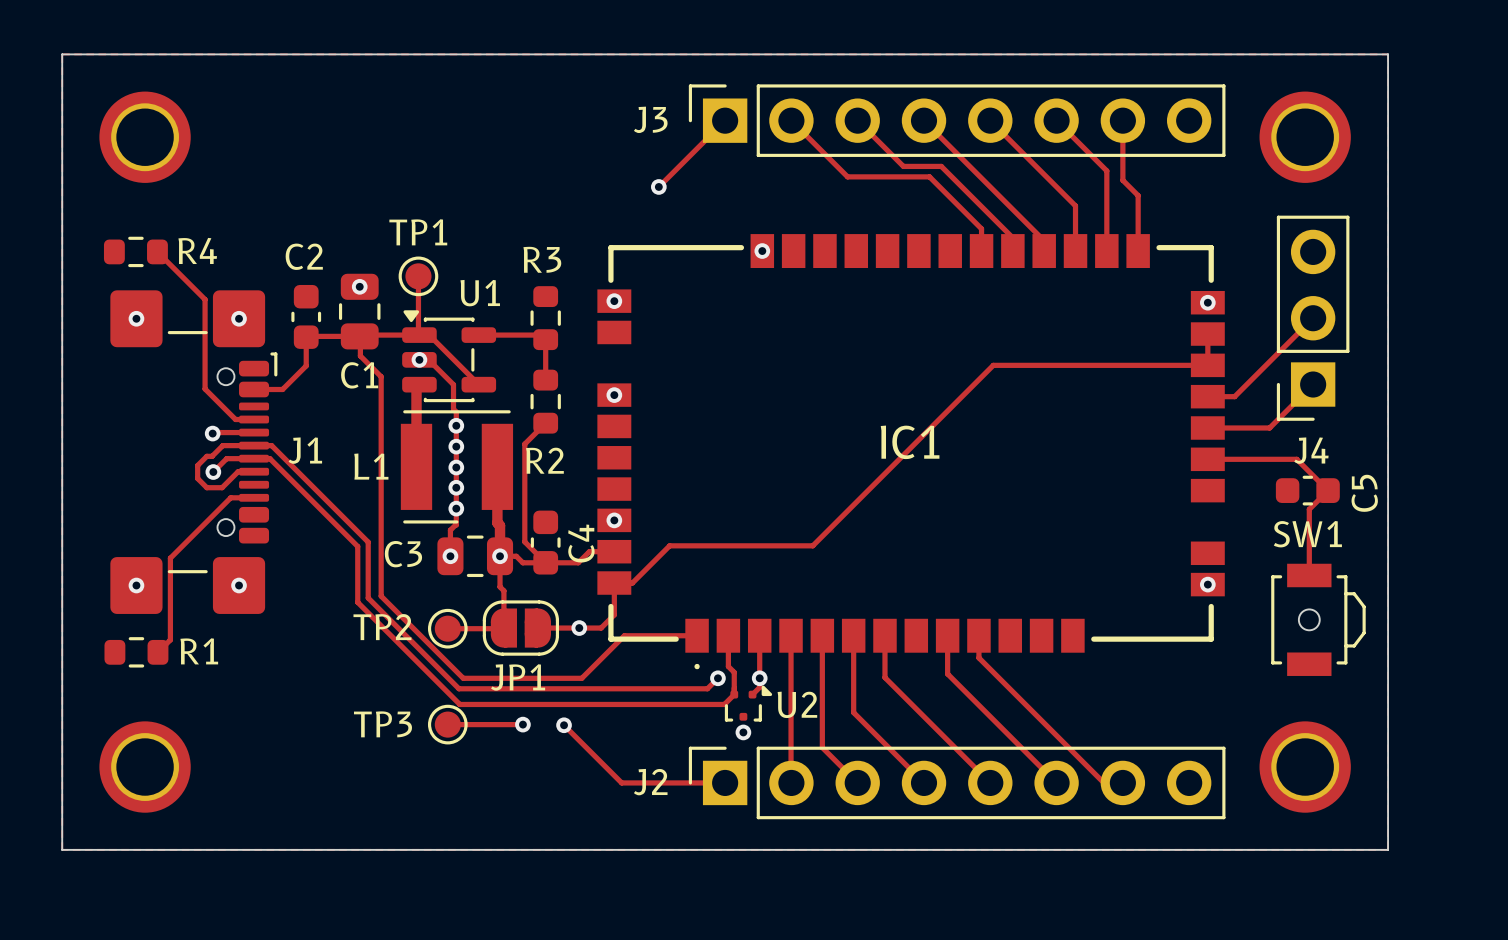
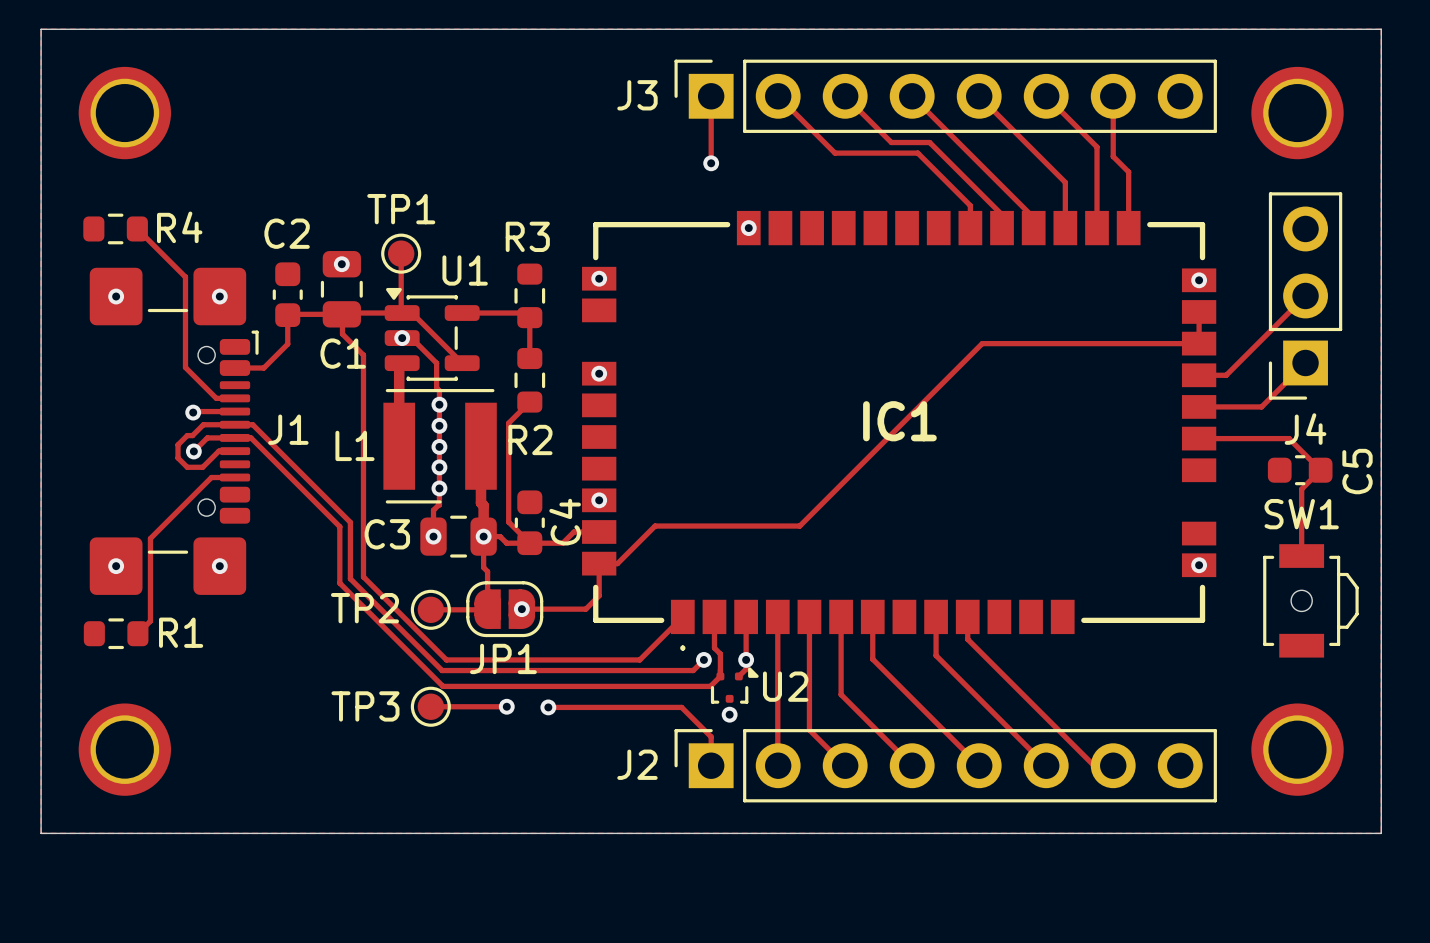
track: (725, 120) (658, 186) -> (711, 96) (711, 163)
via position: (658, 186) -> (711, 163)
via position: (579, 628) -> (521, 609)
track: (697, 635) (624, 635) (581, 678) -> (682, 616) (639, 659) (566, 659)
track: (564, 725) (621, 782) (725, 782) -> (548, 707) (681, 707) (711, 736) (711, 765)

